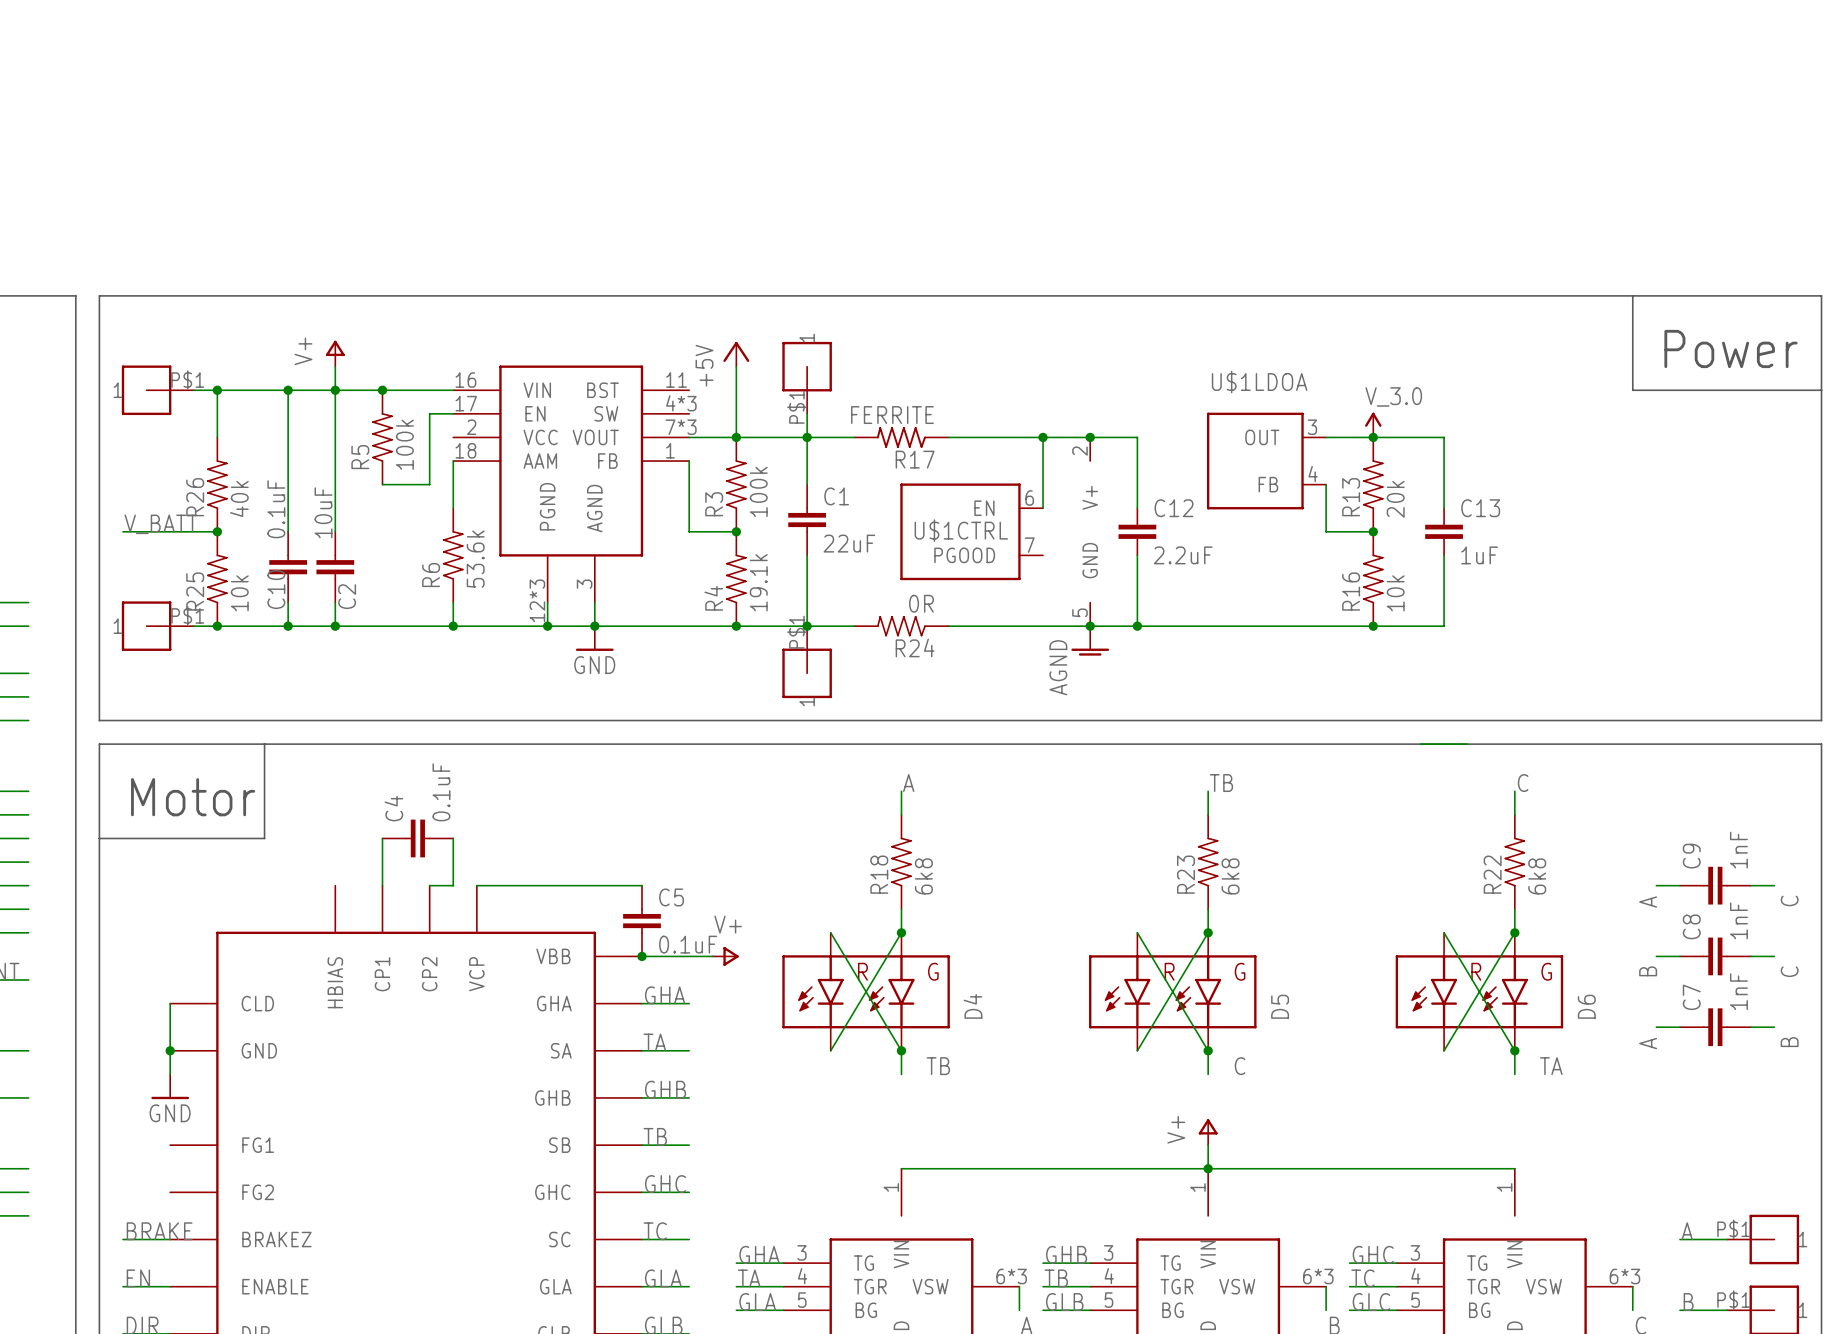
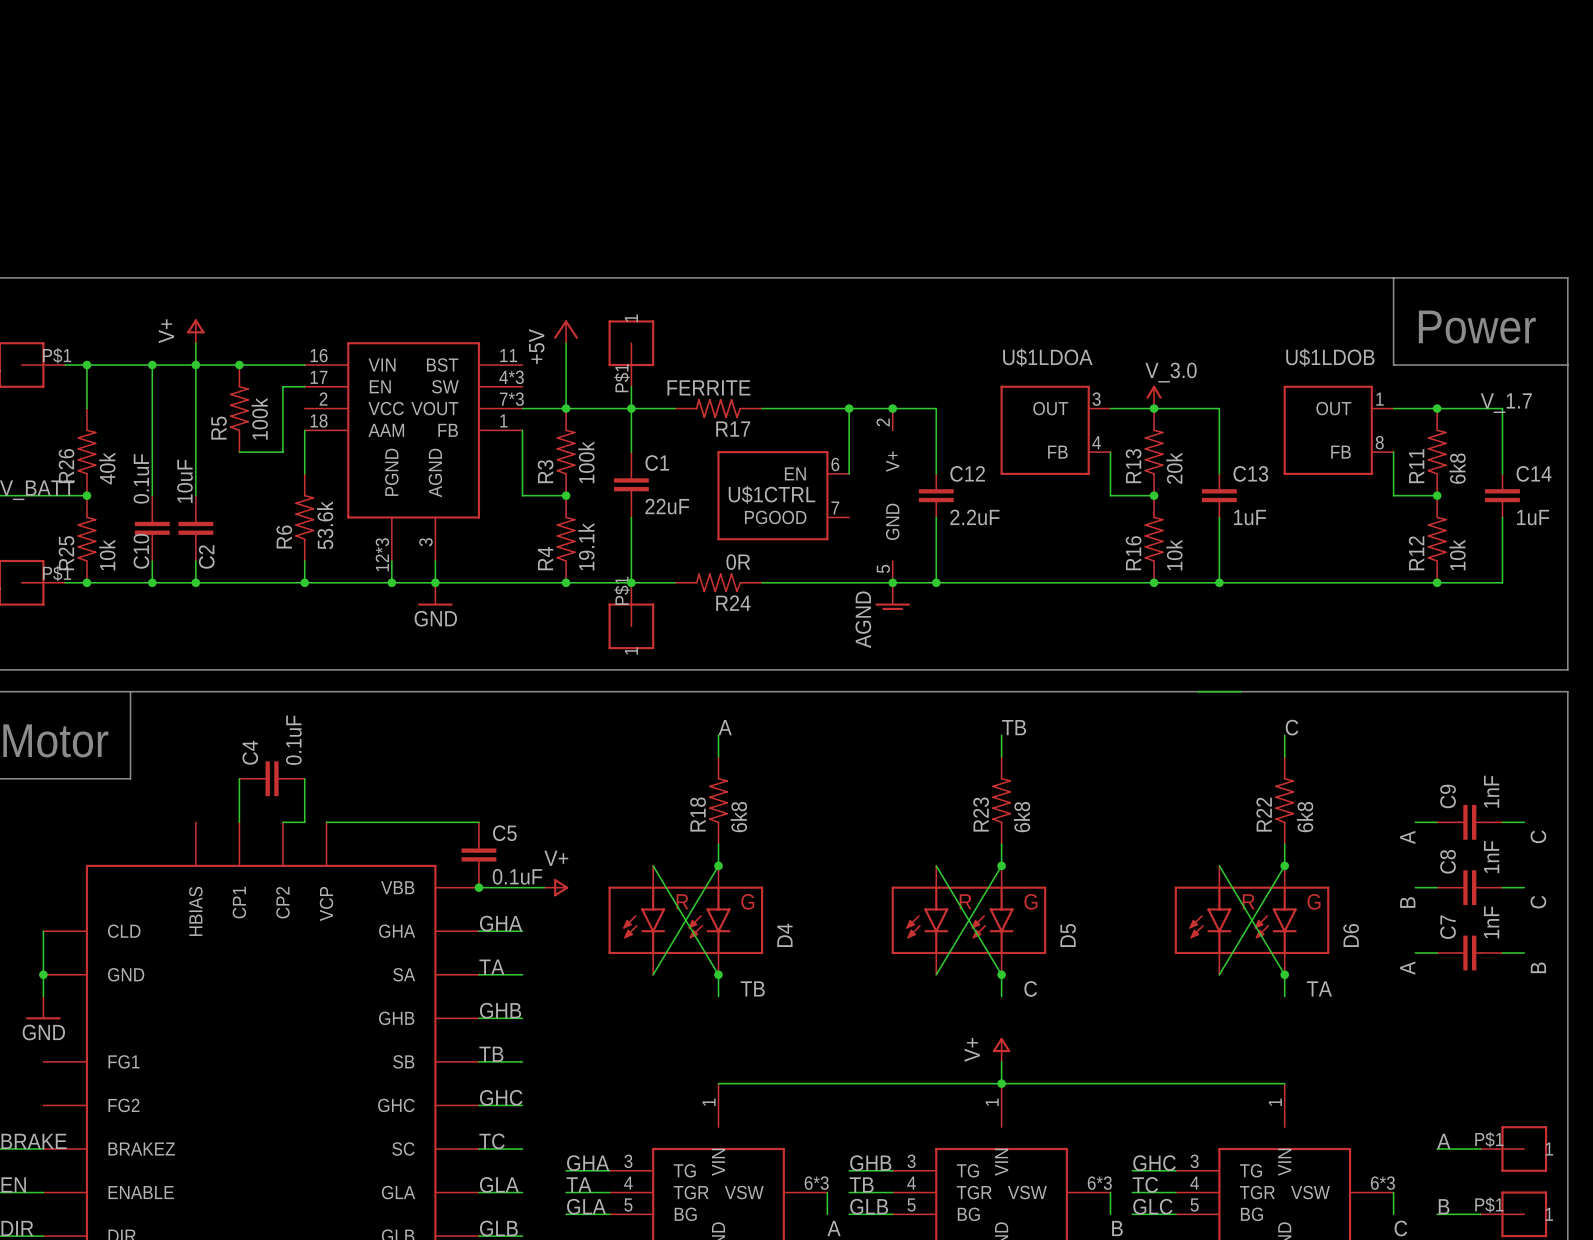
label: none -> V_1.7 (1506, 403)
wire: none -> (1393, 408) (1502, 408) (1502, 473)
junction: none -> (1437, 408)
U$1LDOB: none -> (1338, 430)
wire: none -> (1393, 452) (1393, 495) (1437, 495)
R11: none -> 6k8 (1437, 452)
junction: none -> (1437, 495)
C14: none -> 1uF (1502, 495)
wire: none -> (1502, 517) (1502, 582) (1219, 582)
R12: none -> 10k (1437, 539)
junction: none -> (1219, 582)
junction: none -> (1437, 582)

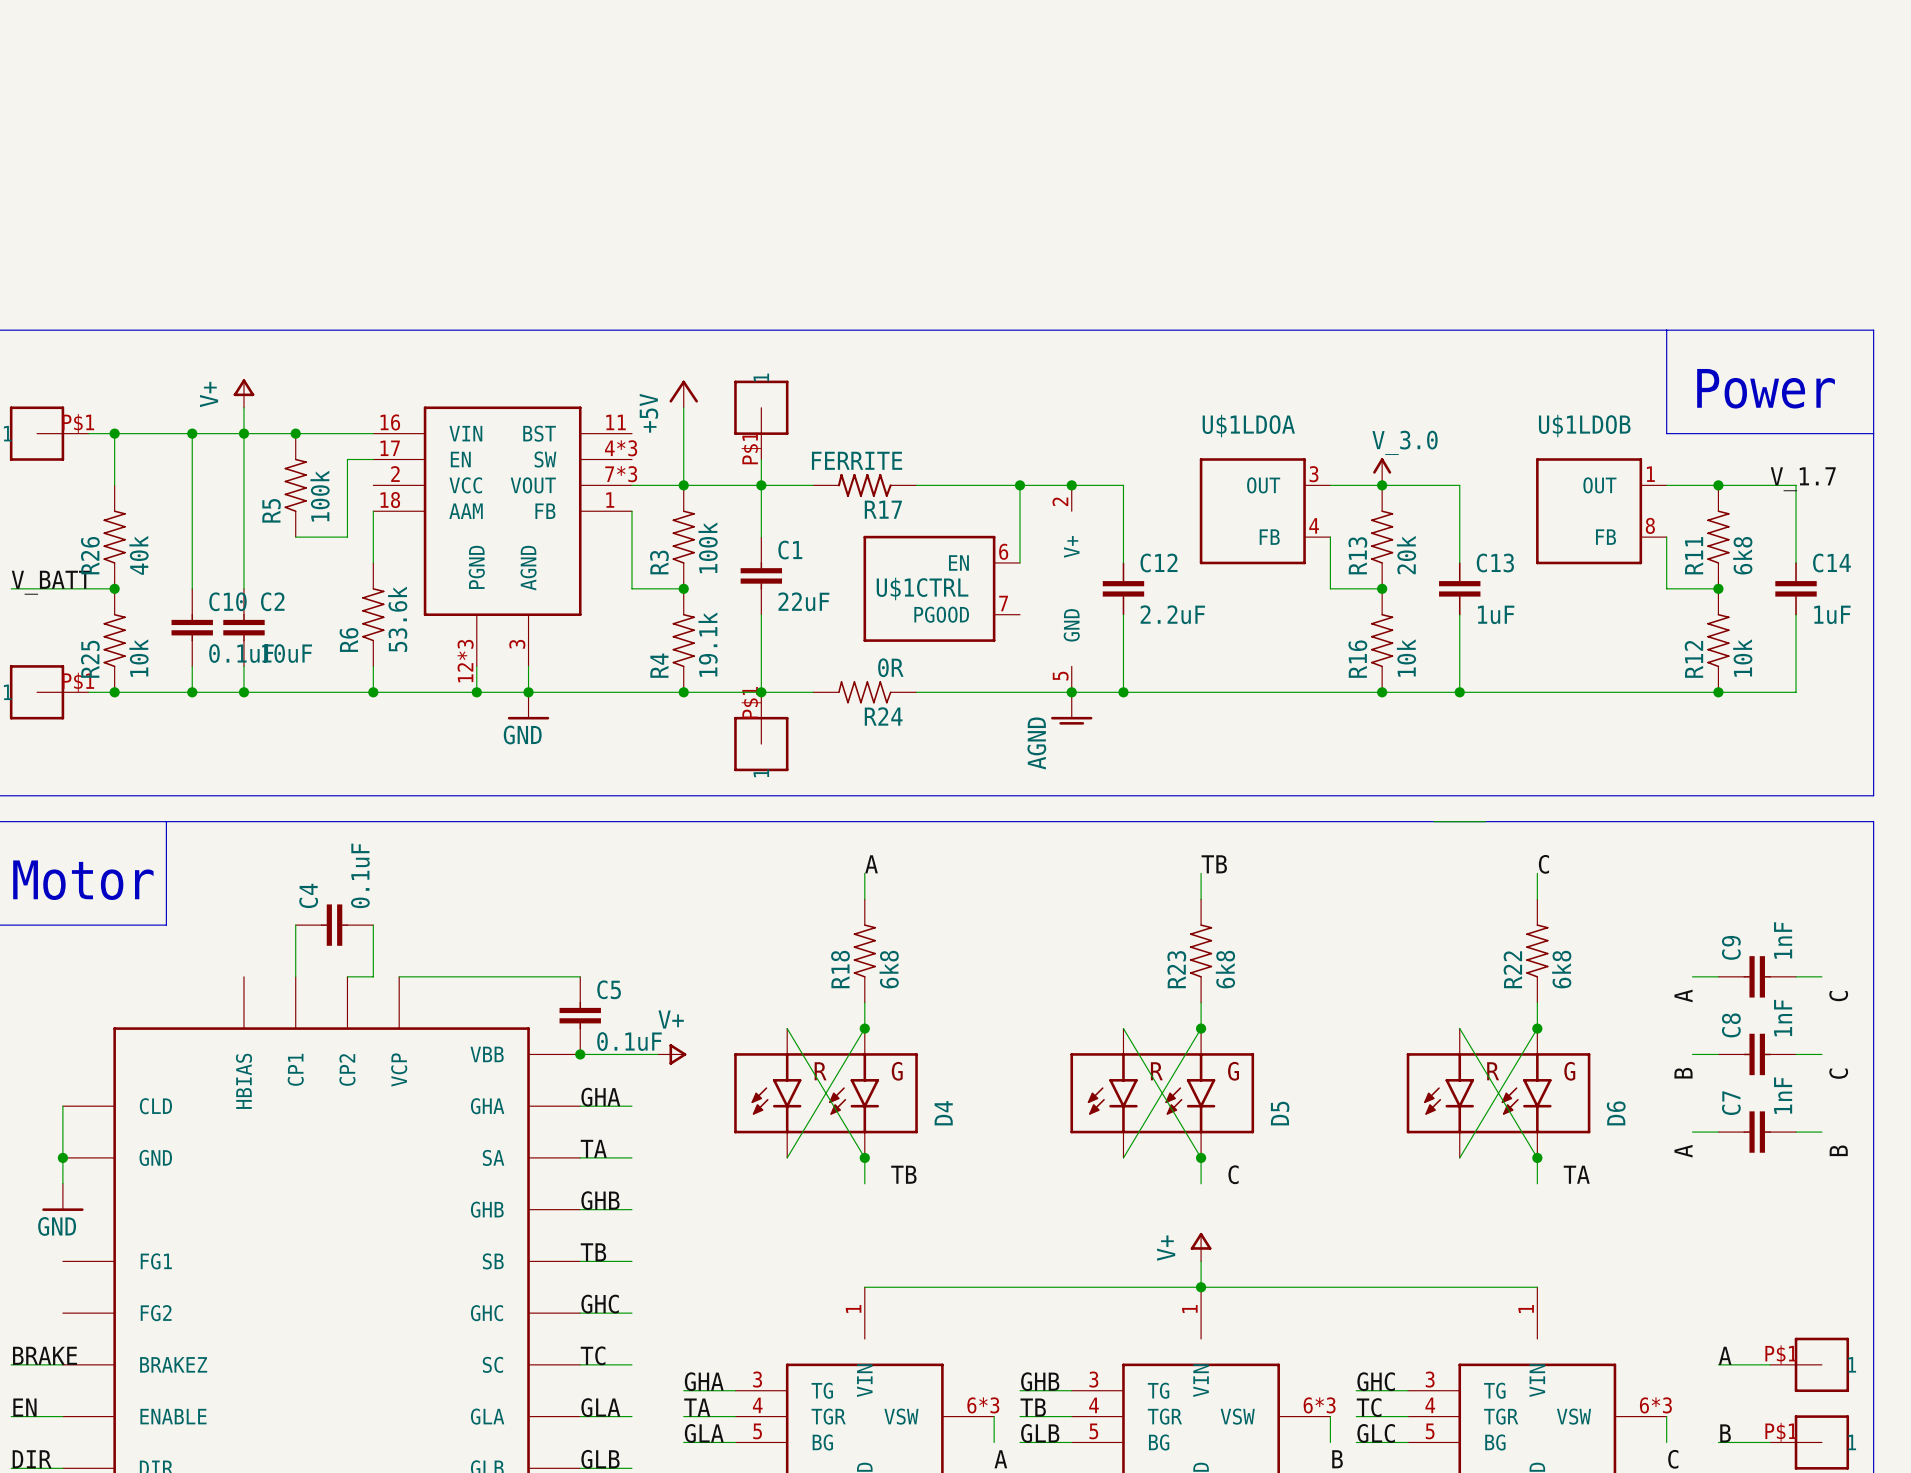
C10 value rotation: 0° (141, 478) -> 90° clockwise (241, 653)
C10 value position: 0.1uF (141, 478) -> 0.1uF (241, 653)
C2 value rotation: 0° (184, 481) -> 90° clockwise (287, 653)
C2 value position: 10uF (184, 481) -> 10uF (287, 653)
C10 name rotation: 0° (141, 551) -> 90° clockwise (227, 601)
C10 name position: C10 (141, 551) -> C10 (227, 601)
C2 name rotation: 0° (206, 556) -> 90° clockwise (272, 601)
C2 name position: C2 (206, 556) -> C2 (272, 601)

